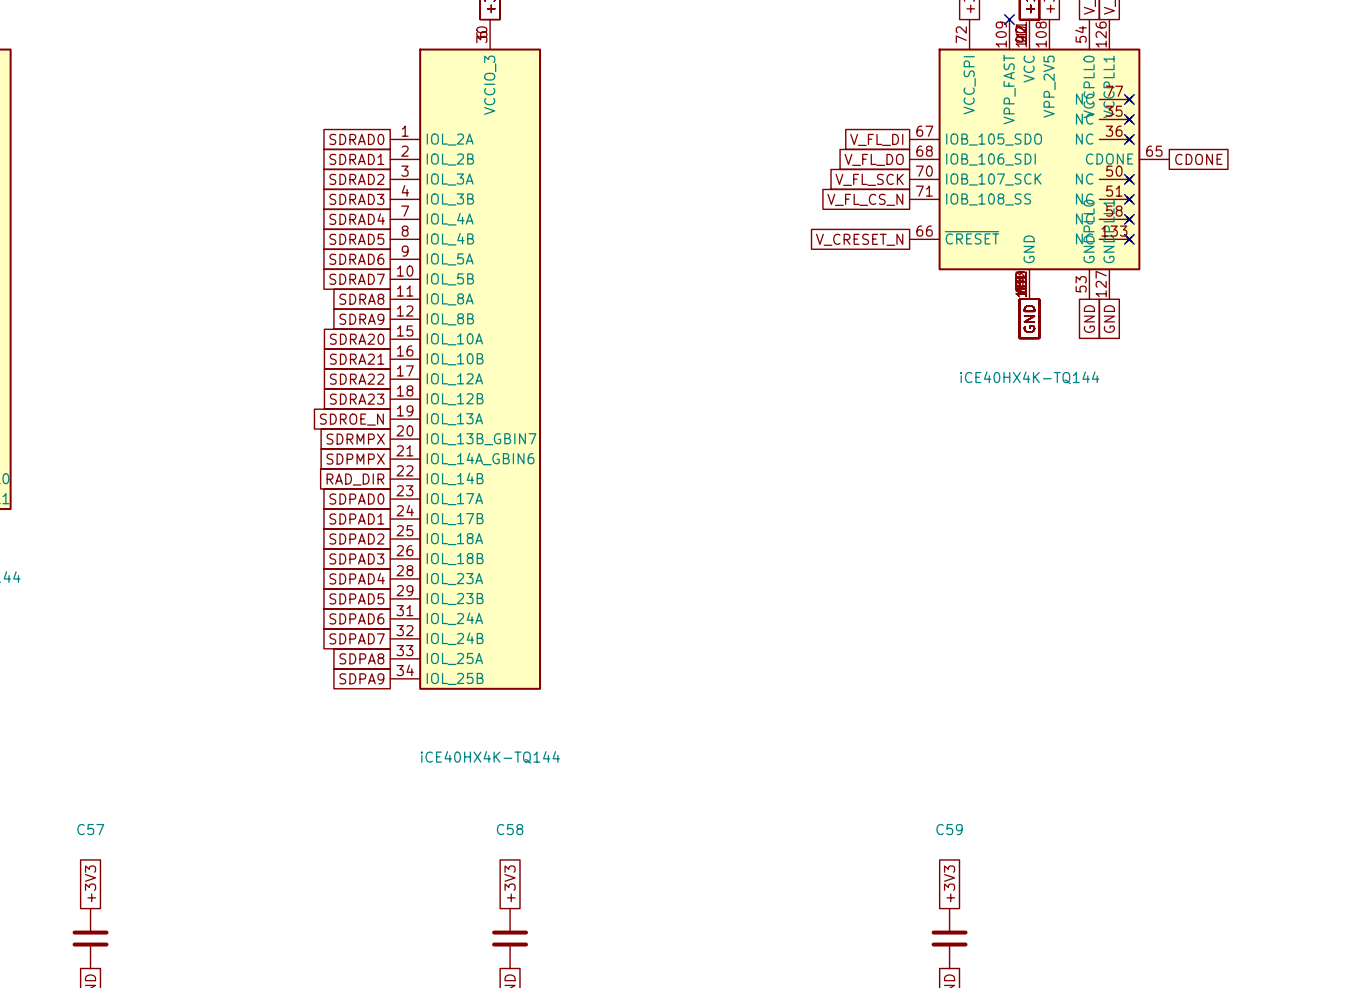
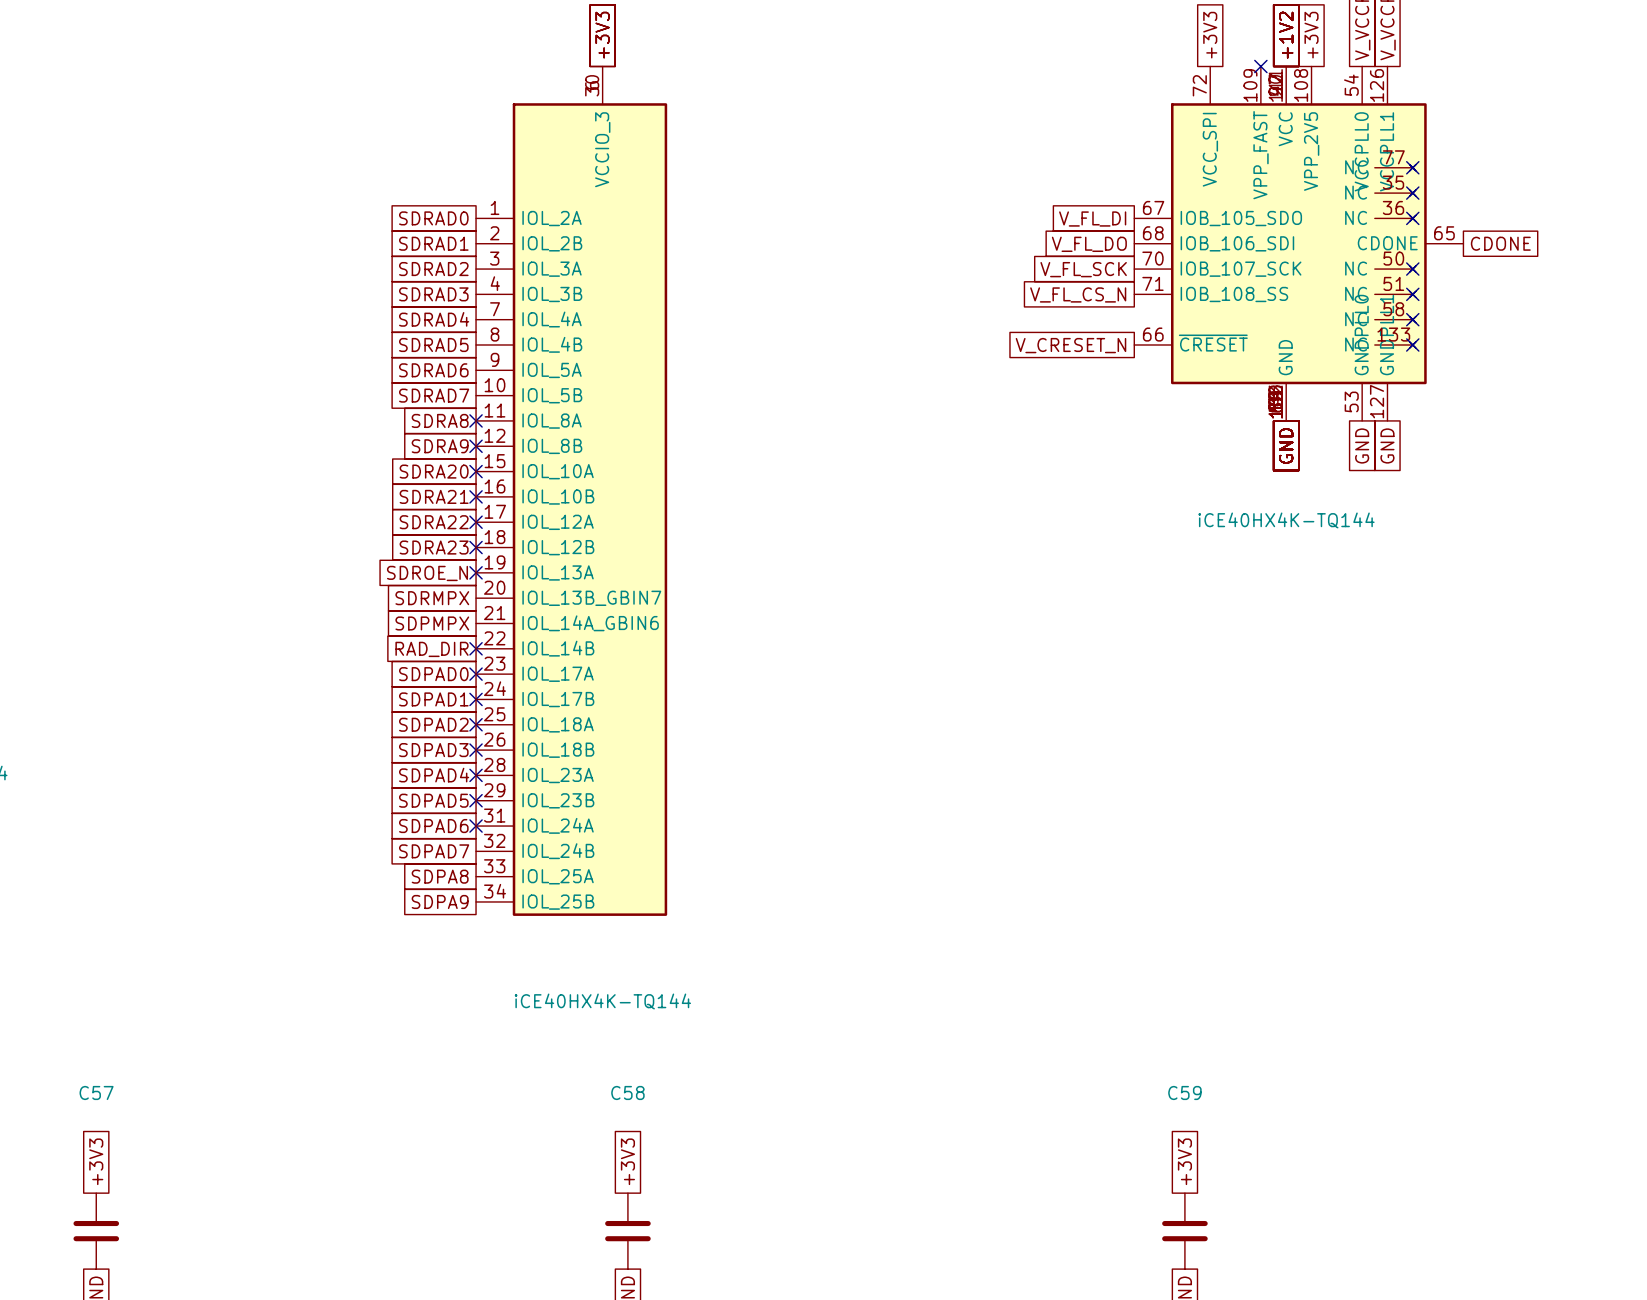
no-connect mark: none -> (476, 420)
no-connect mark: none -> (476, 446)
no-connect mark: none -> (476, 471)
no-connect mark: none -> (476, 496)
no-connect mark: none -> (476, 522)
no-connect mark: none -> (476, 547)
no-connect mark: none -> (476, 572)
no-connect mark: none -> (476, 648)
no-connect mark: none -> (476, 674)
no-connect mark: none -> (476, 699)
no-connect mark: none -> (476, 724)
no-connect mark: none -> (476, 750)
no-connect mark: none -> (476, 775)
no-connect mark: none -> (476, 800)
no-connect mark: none -> (476, 826)

